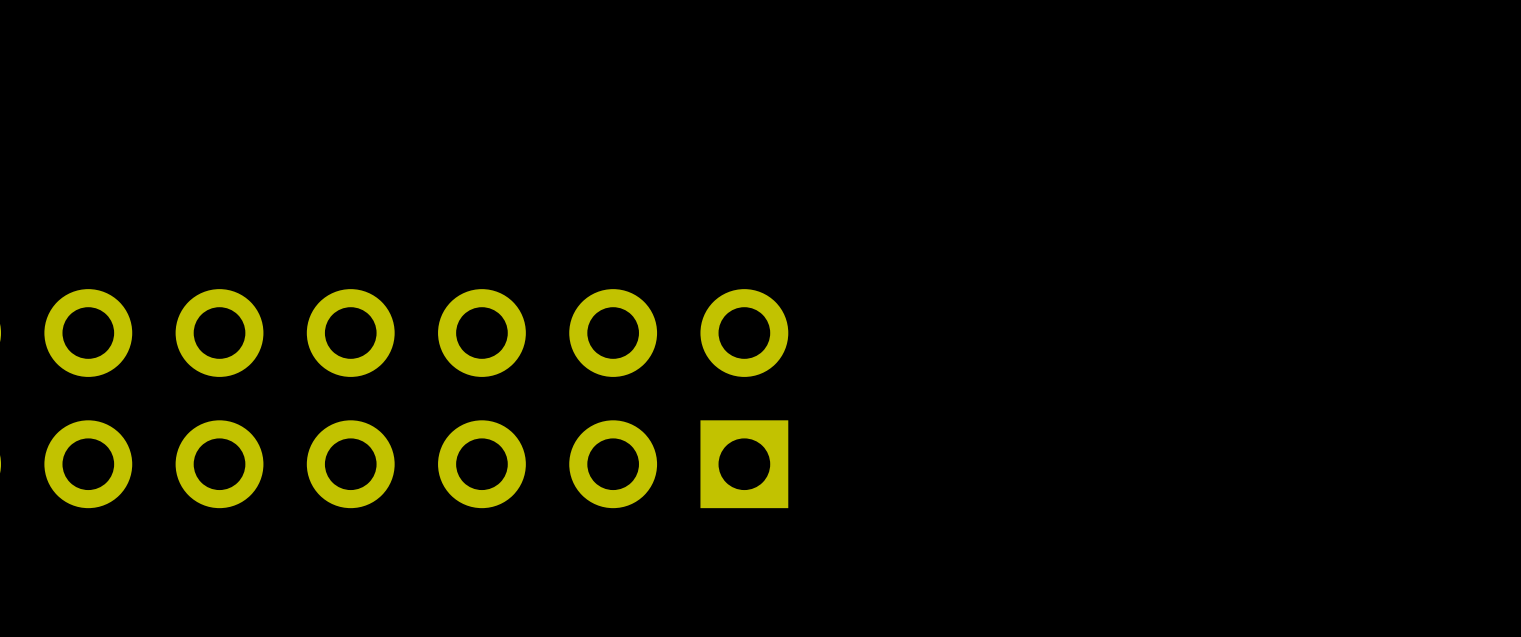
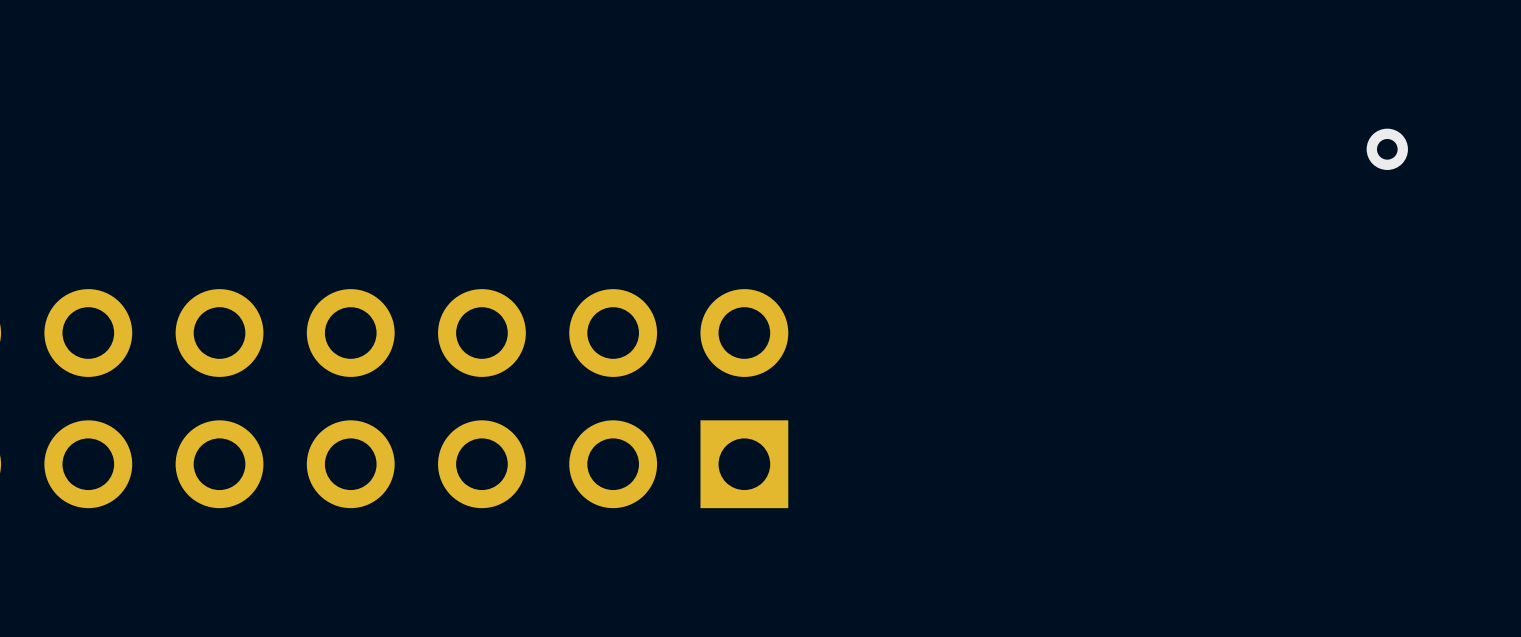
via: none -> (1387, 149)

